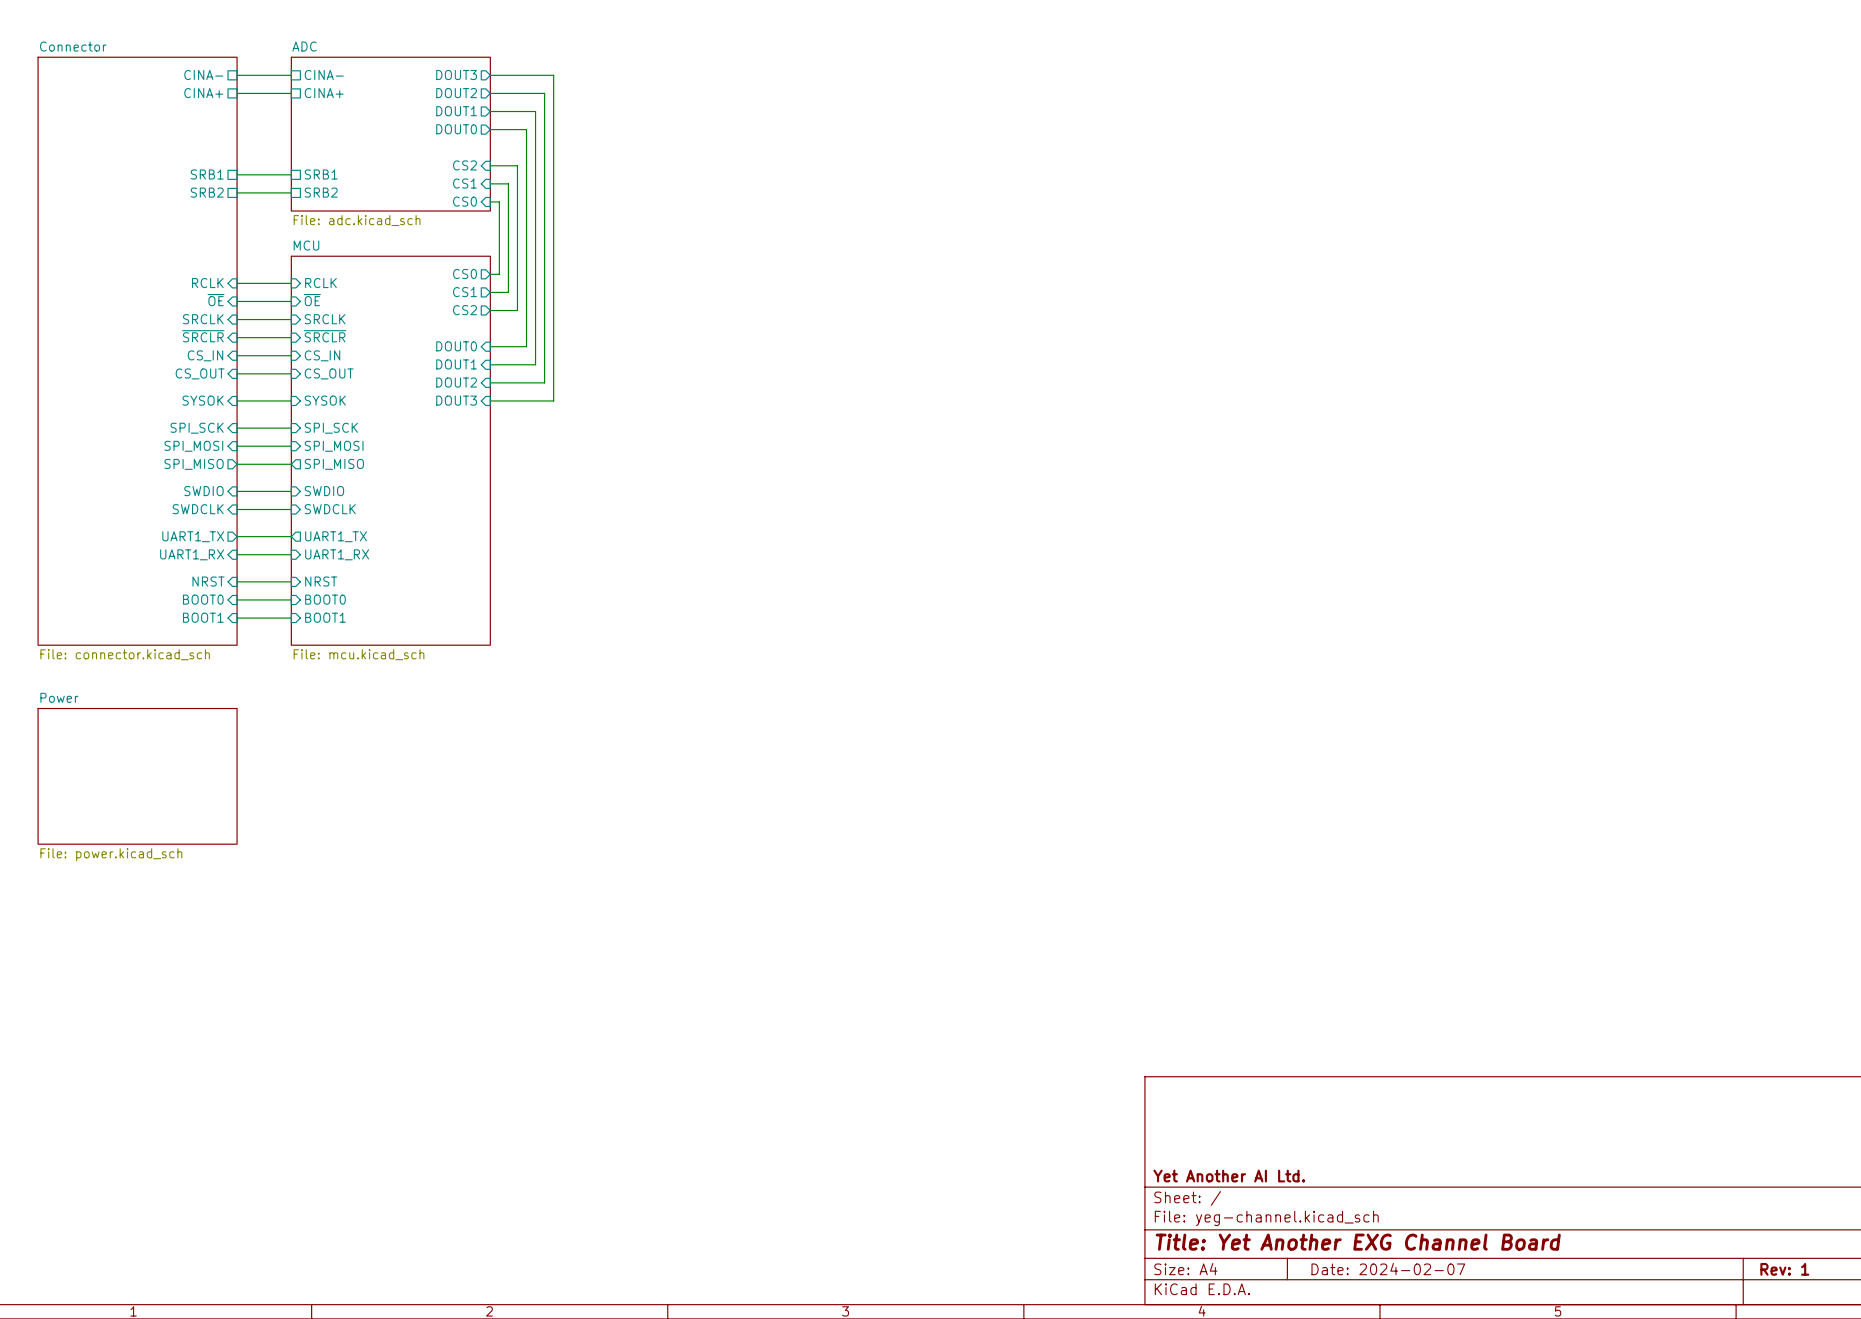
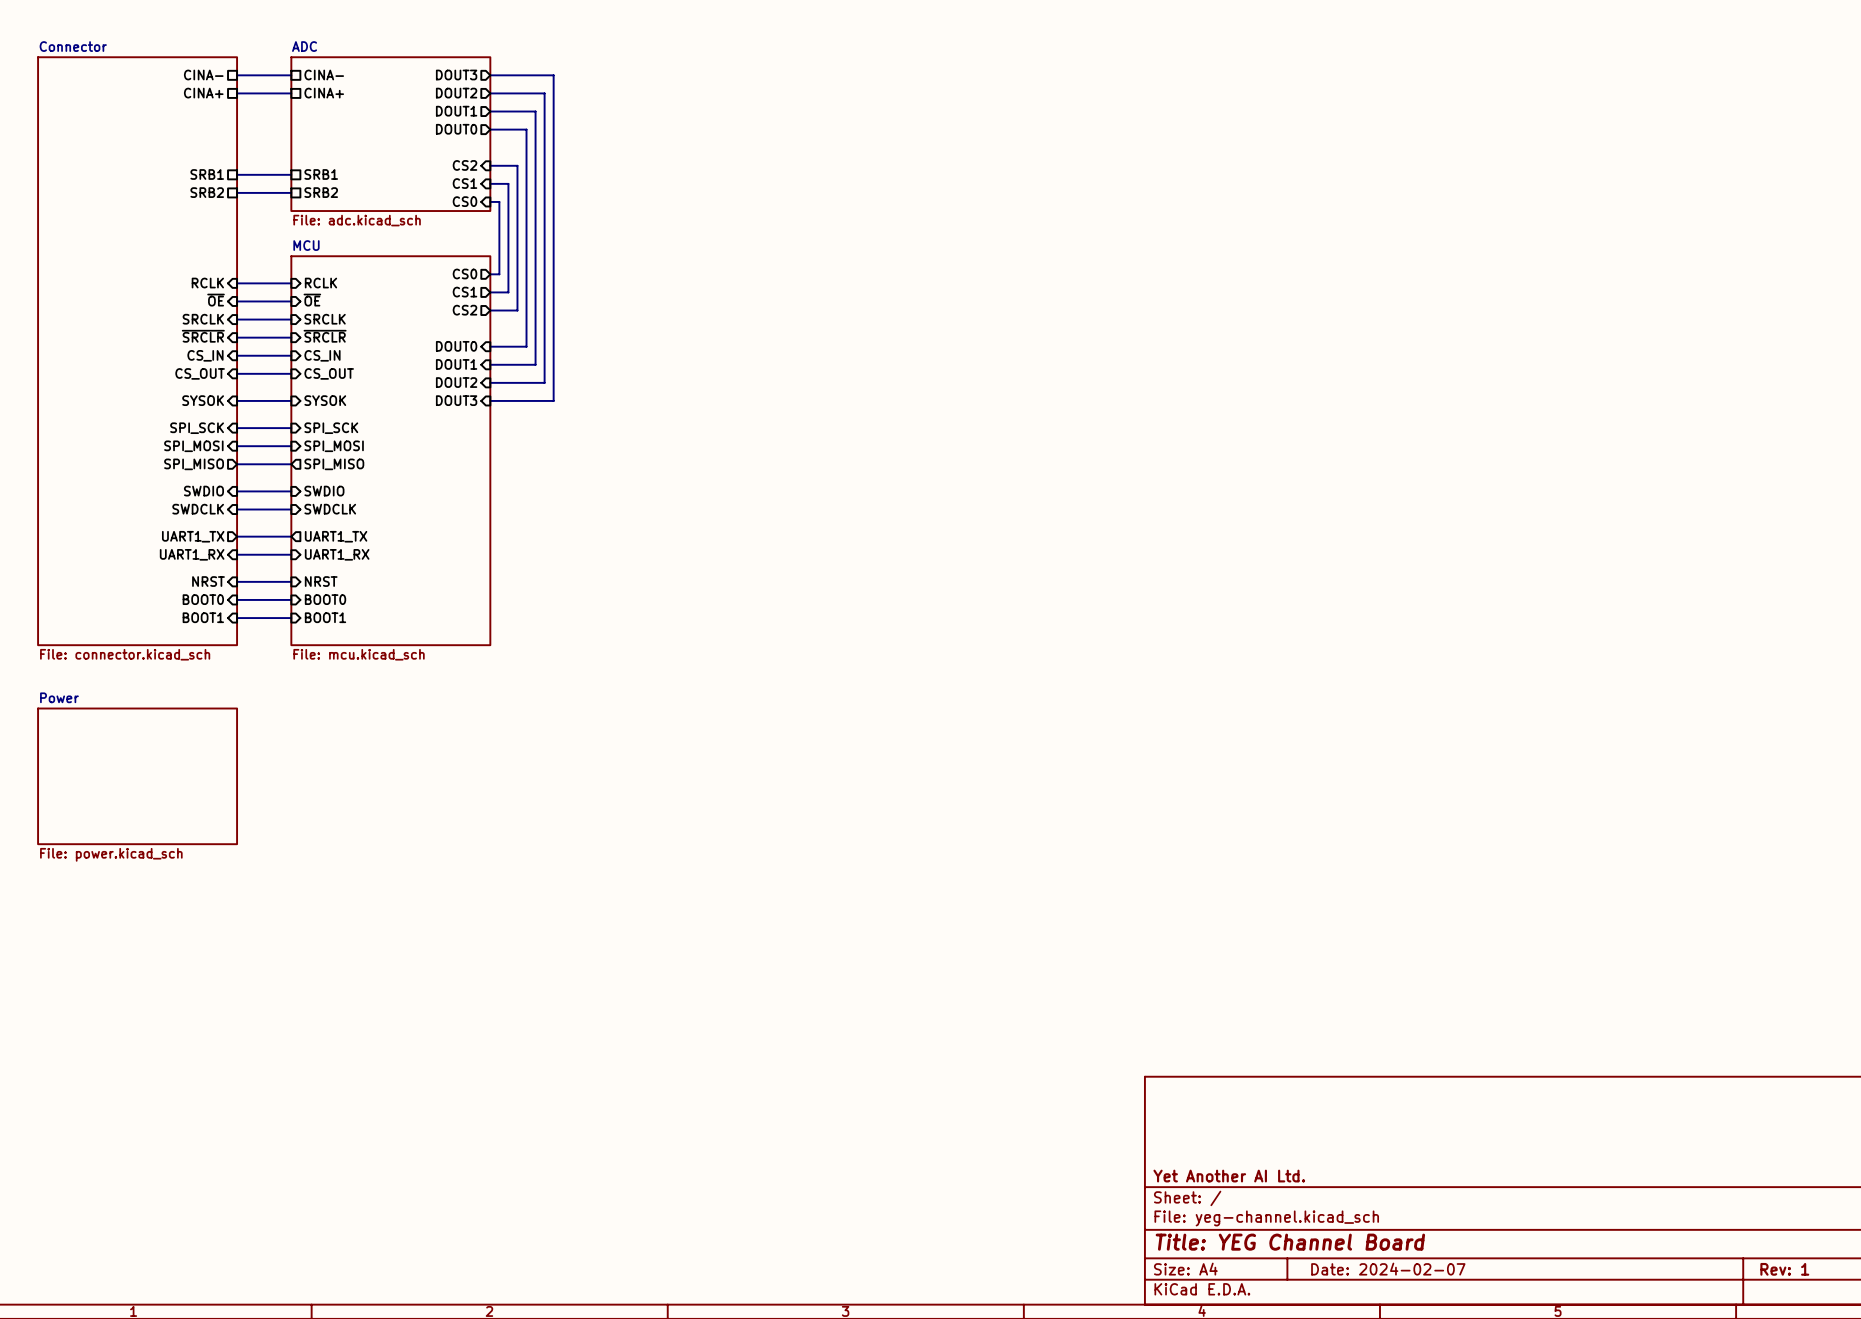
title block: Title: Yet Another EXG Channel Board (1358, 1242) -> Title: YEG Channel Board (1290, 1242)

